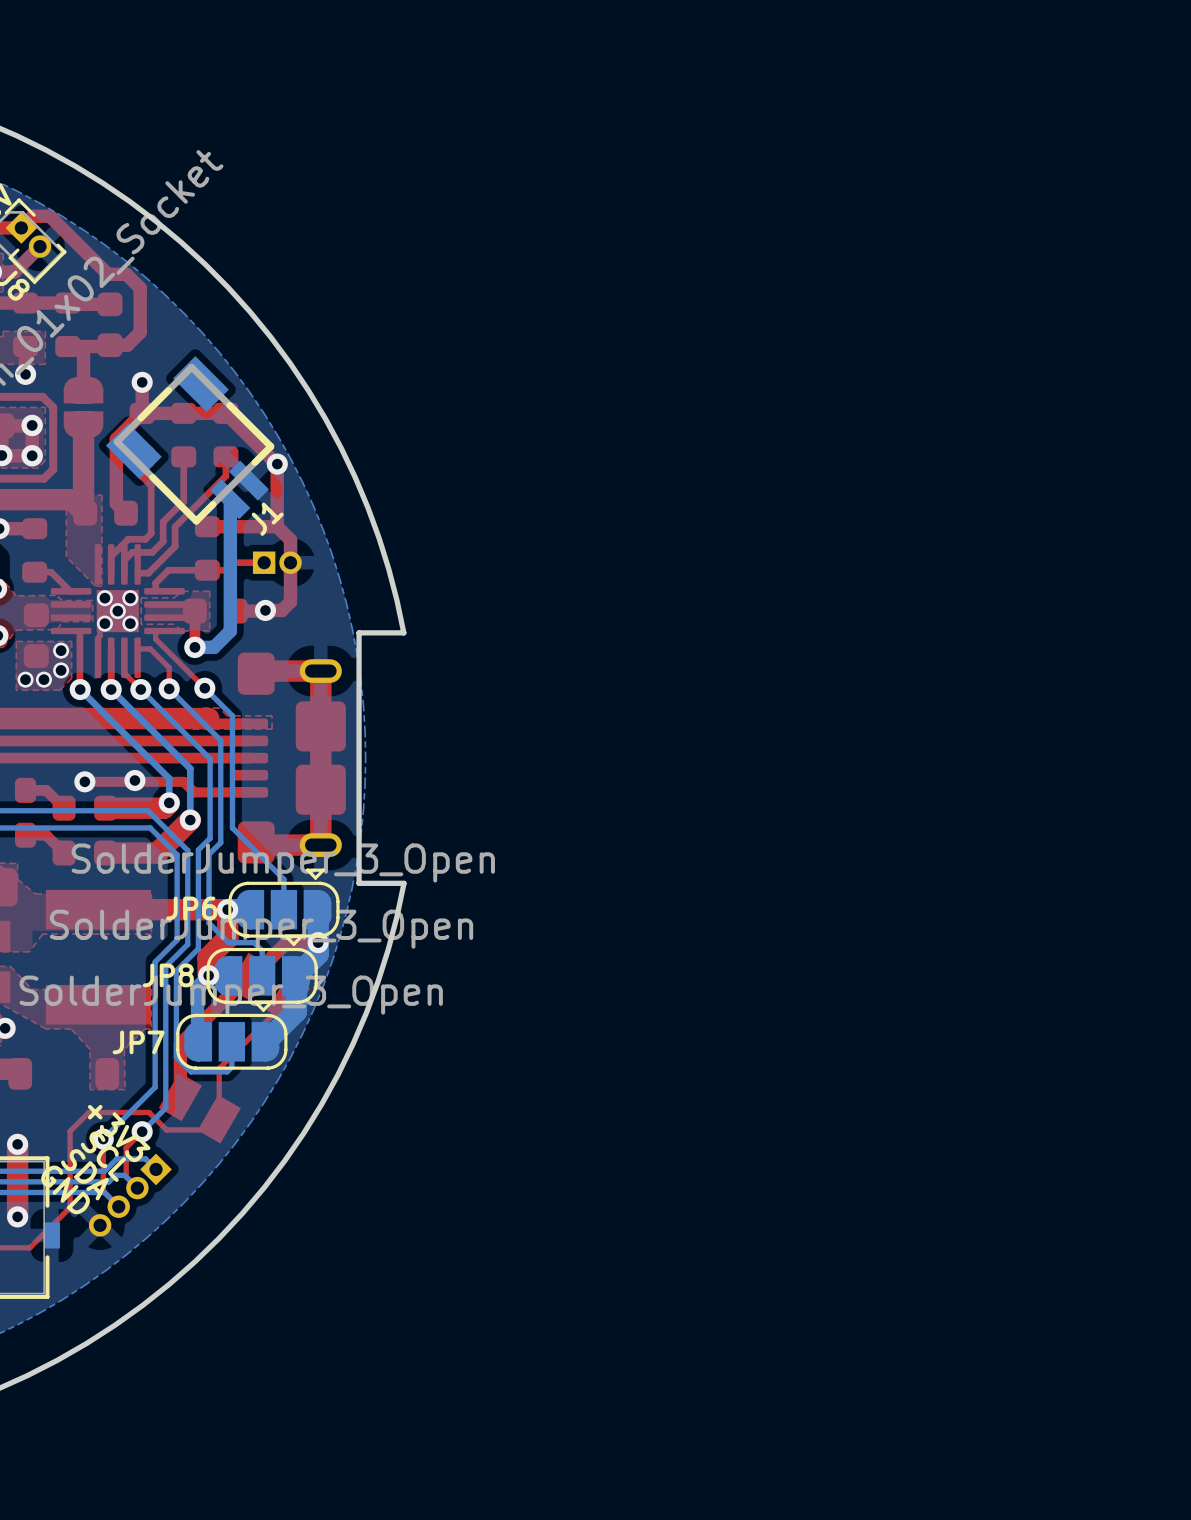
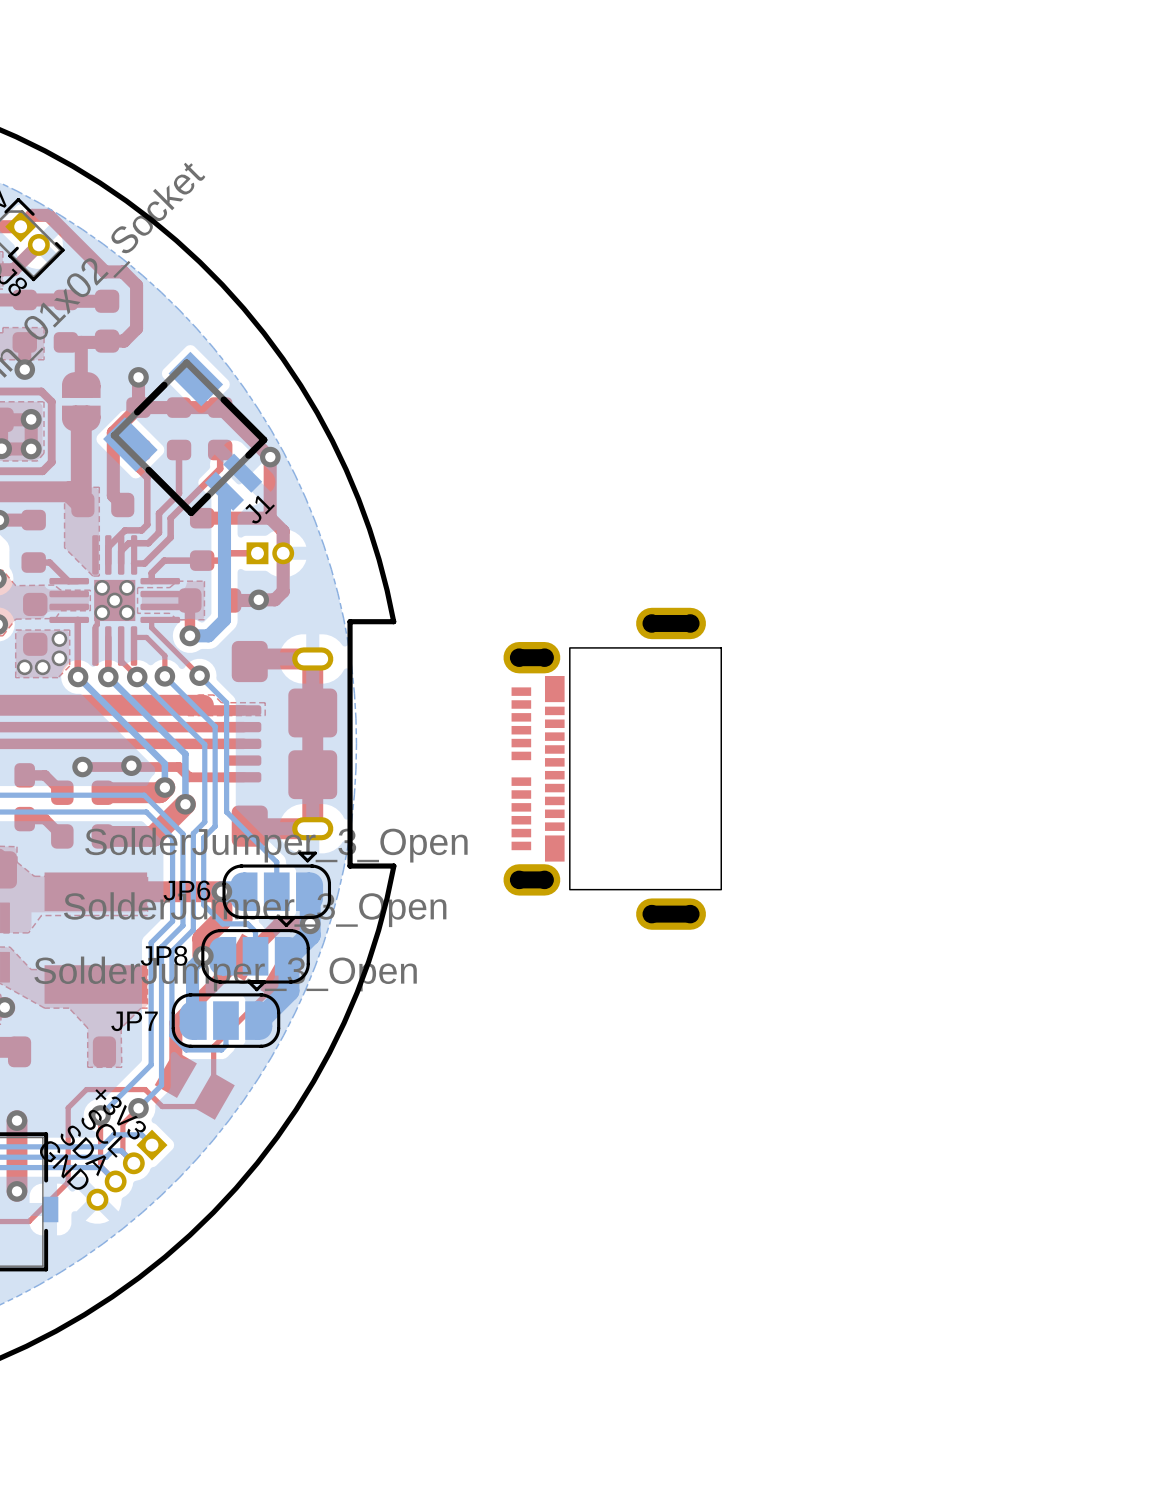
part: none -> (612, 768)

